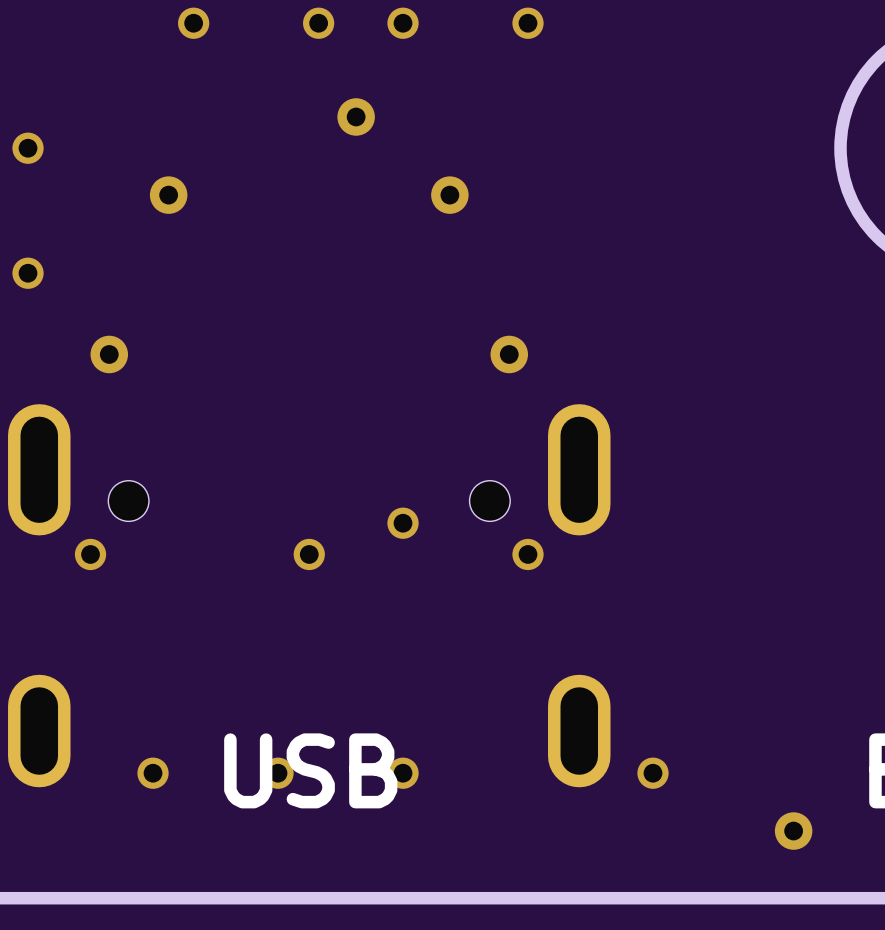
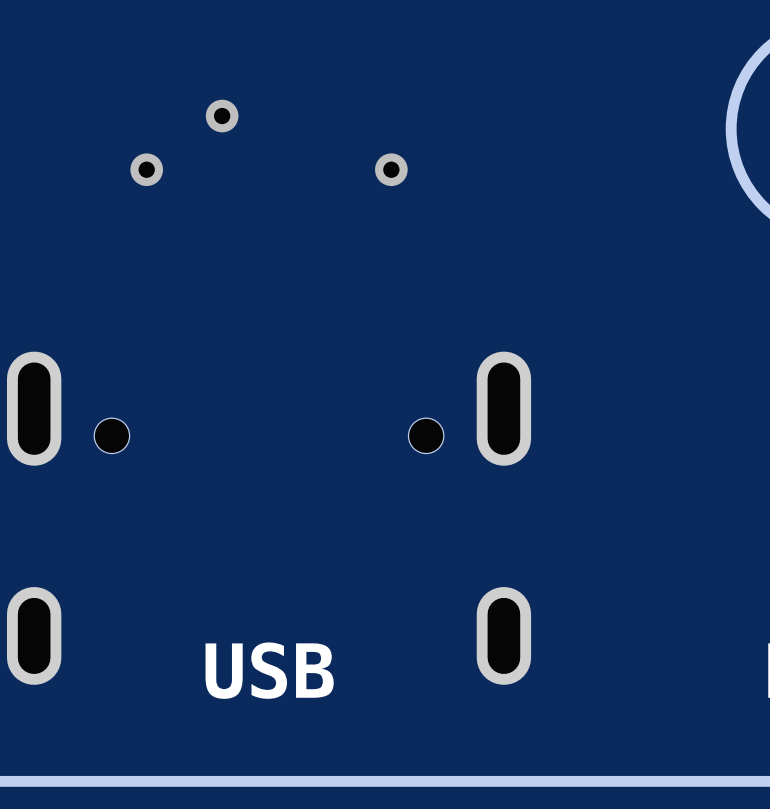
via: (193, 23) -> none
via: (318, 23) -> none
via: (403, 23) -> none
via: (528, 23) -> none
via position: (356, 116) -> (222, 116)
via: (28, 148) -> none
via: (28, 273) -> none
via: (109, 354) -> none
via: (509, 354) -> none
via: (403, 523) -> none
via: (90, 554) -> none
via: (309, 554) -> none
via: (528, 554) -> none
via: (153, 773) -> none
via: (278, 773) -> none
via: (403, 773) -> none
via: (653, 773) -> none
via: (793, 831) -> none

